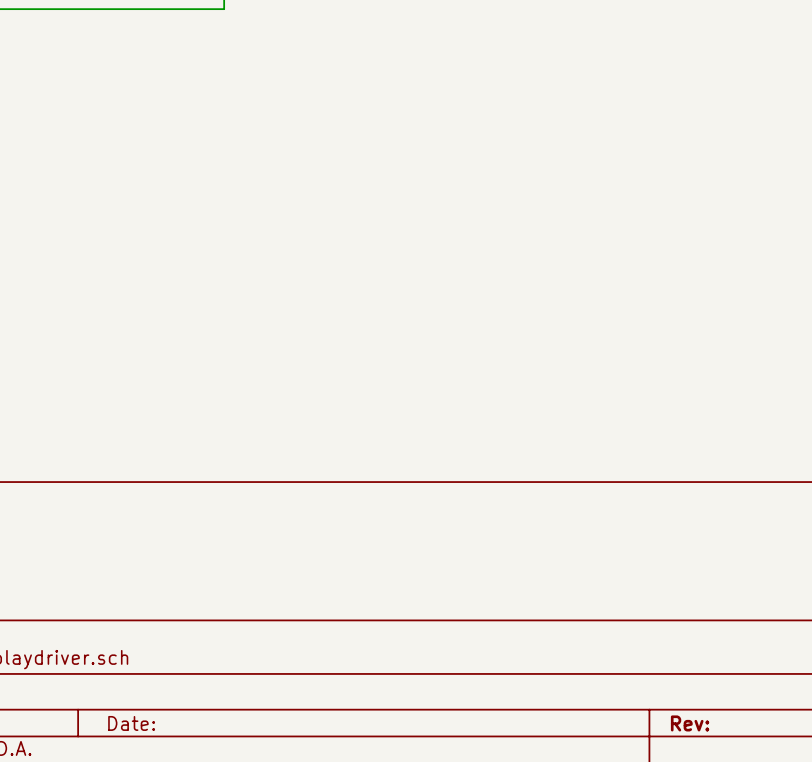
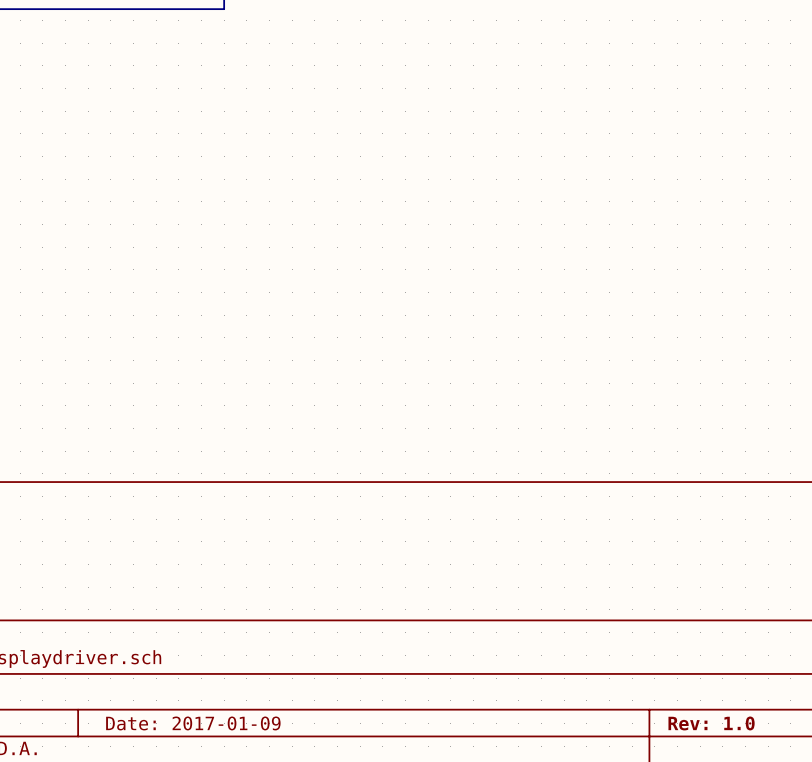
title block: Date: (131, 723) -> Date: 2017-01-09 (193, 723)
title block: Rev: (690, 723) -> Rev: 1.0 (711, 723)

